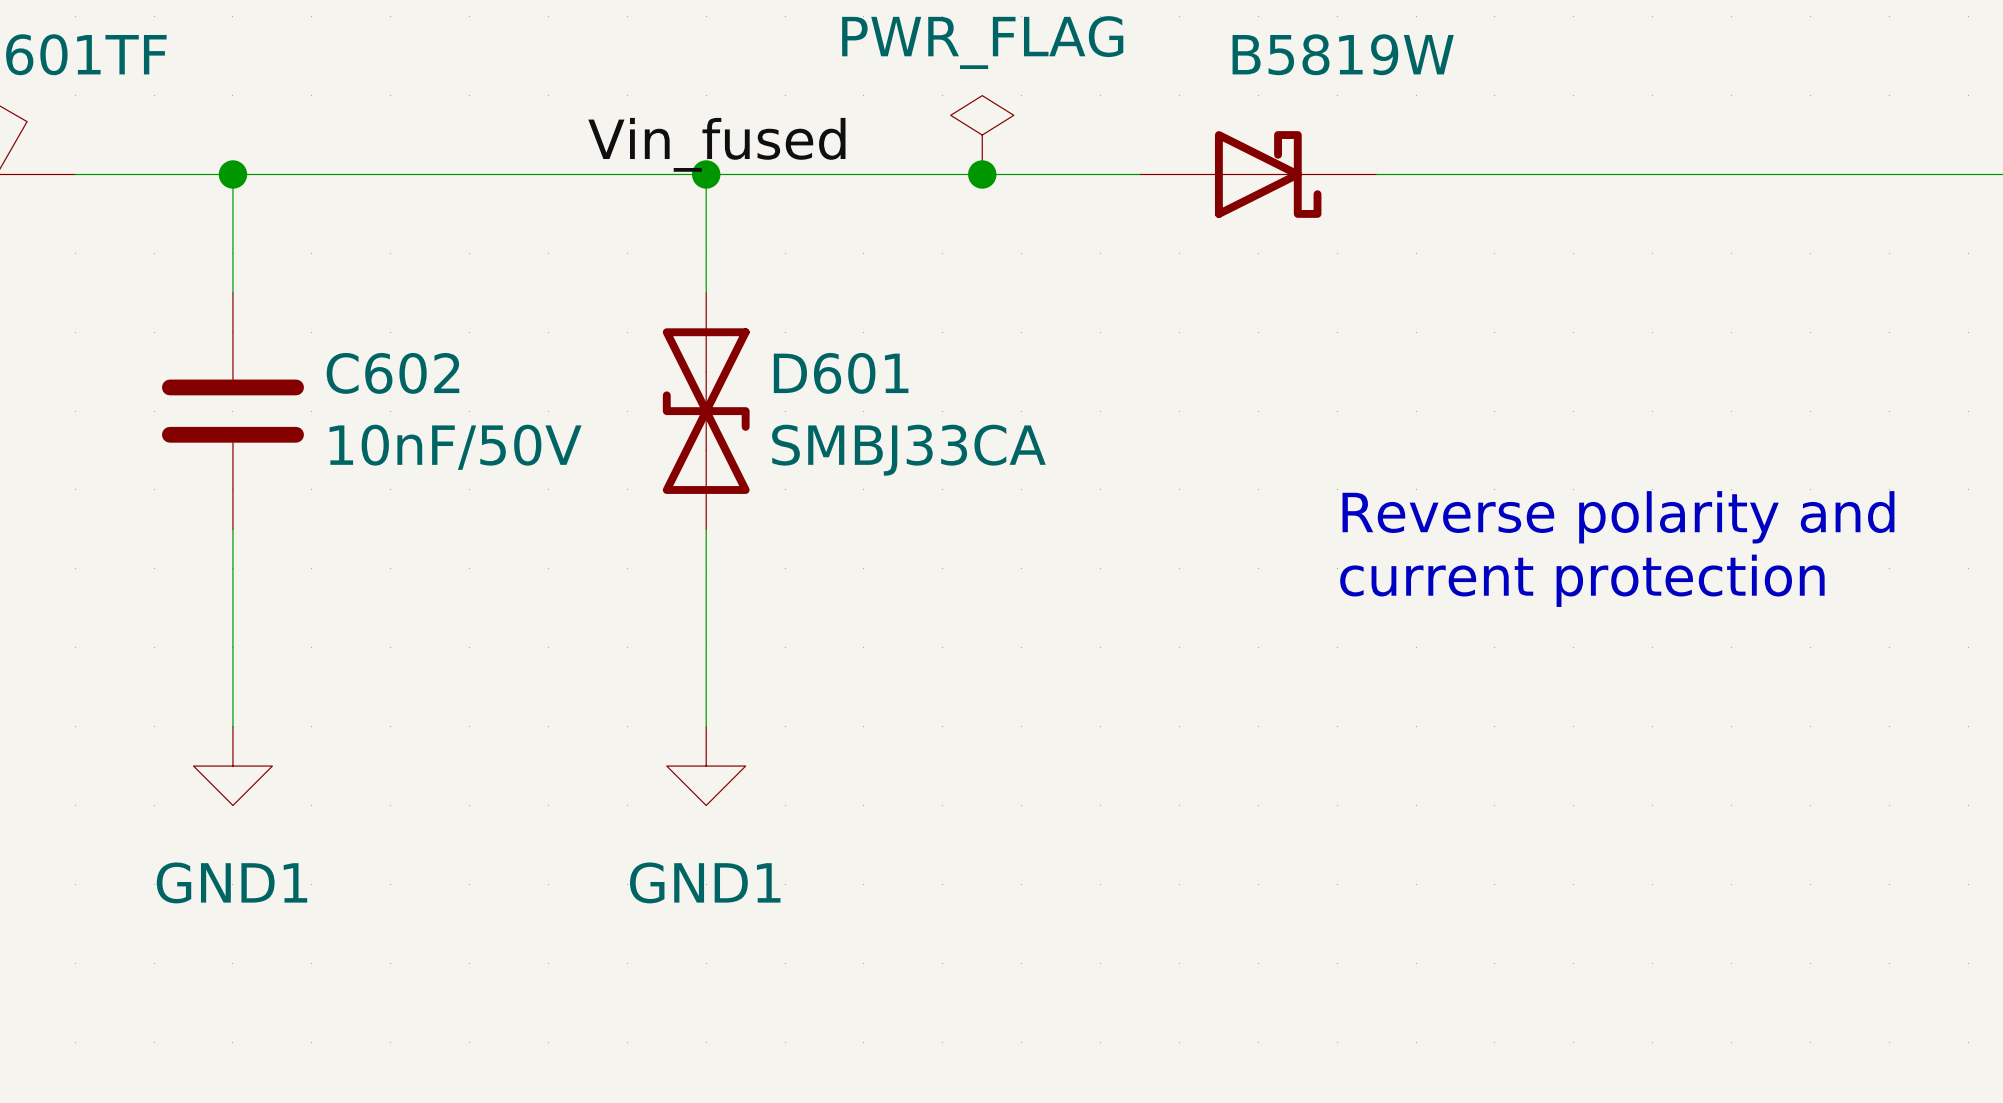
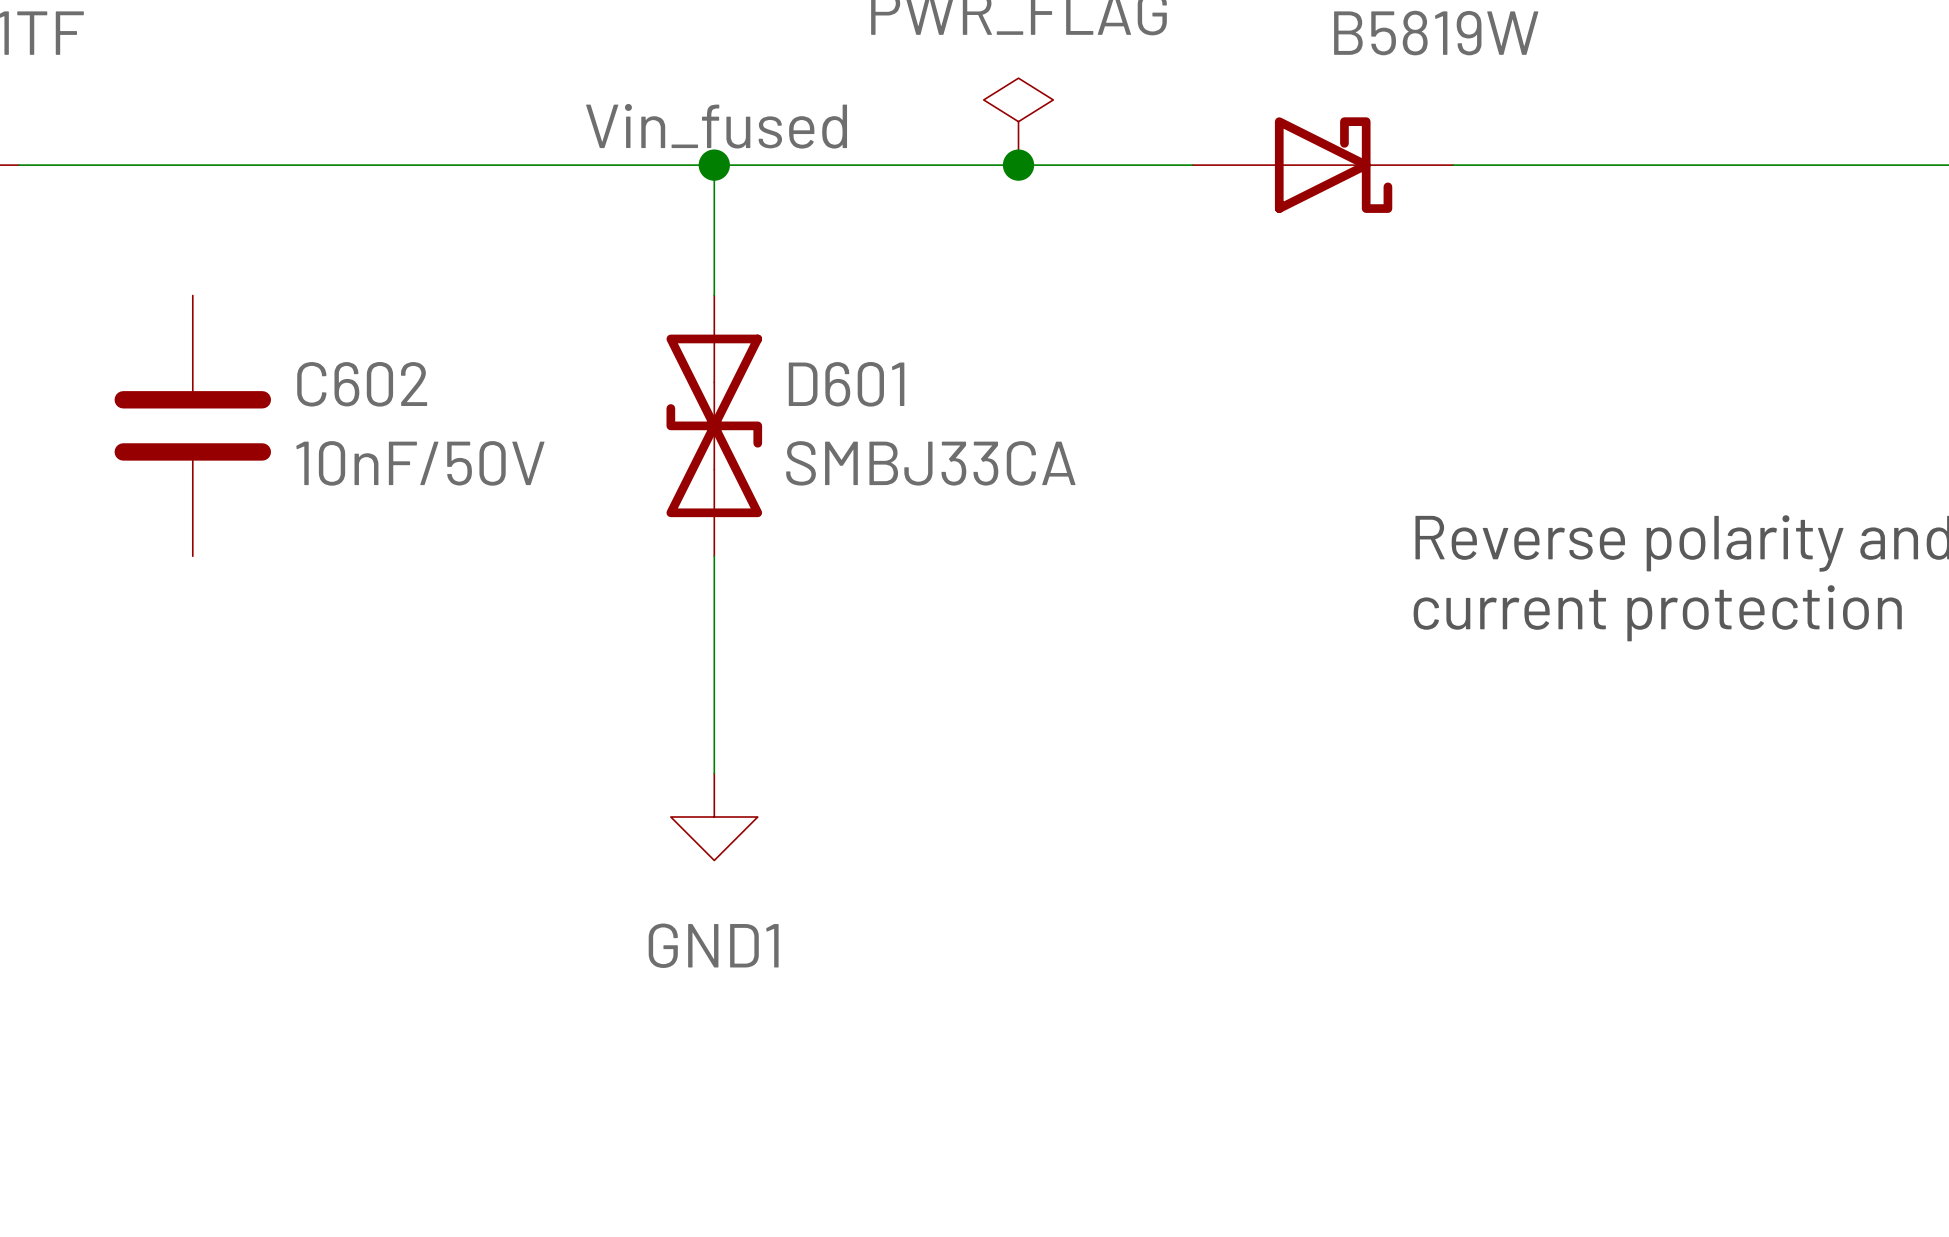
wire: (232, 174) (232, 292) -> none
junction: (232, 174) -> none
wire: (232, 529) (232, 726) -> none
power symbol: GND1 (232, 766) -> none

